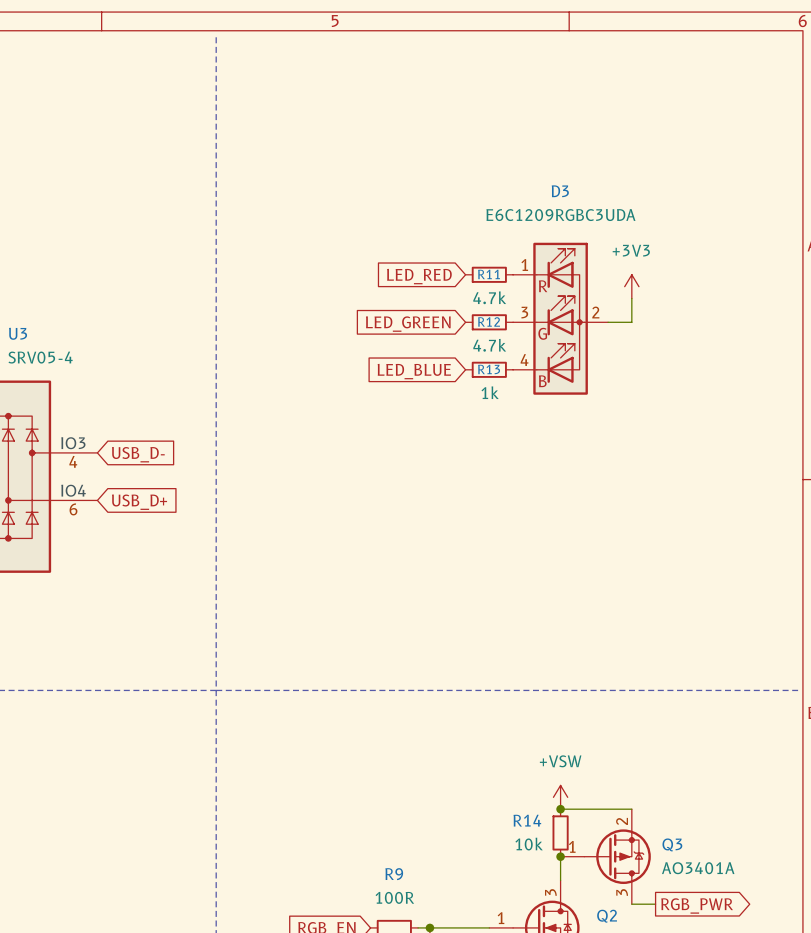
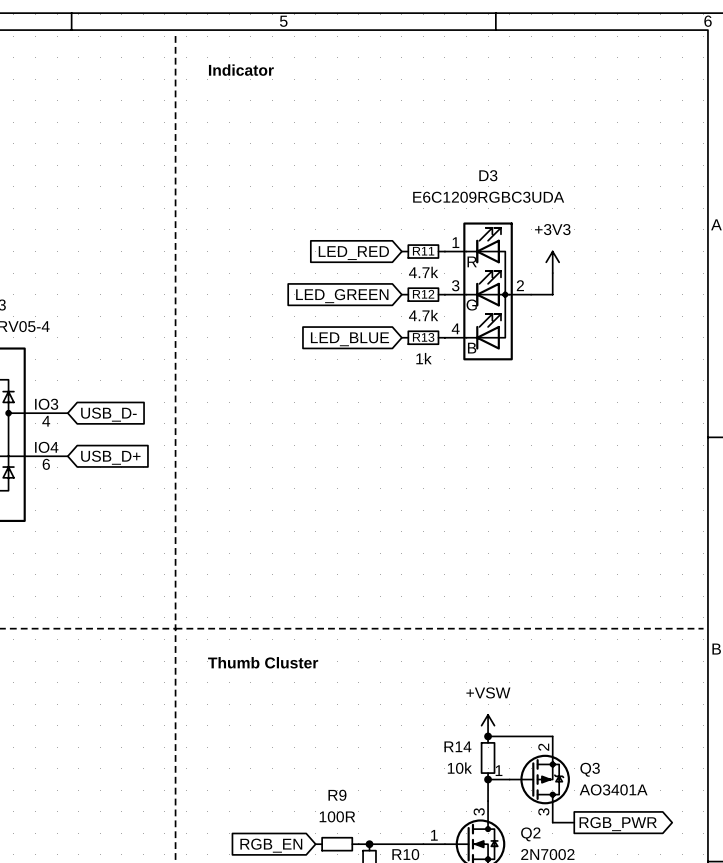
text: none -> Indicator (241, 70)
text: none -> Thumb Cluster (263, 662)

